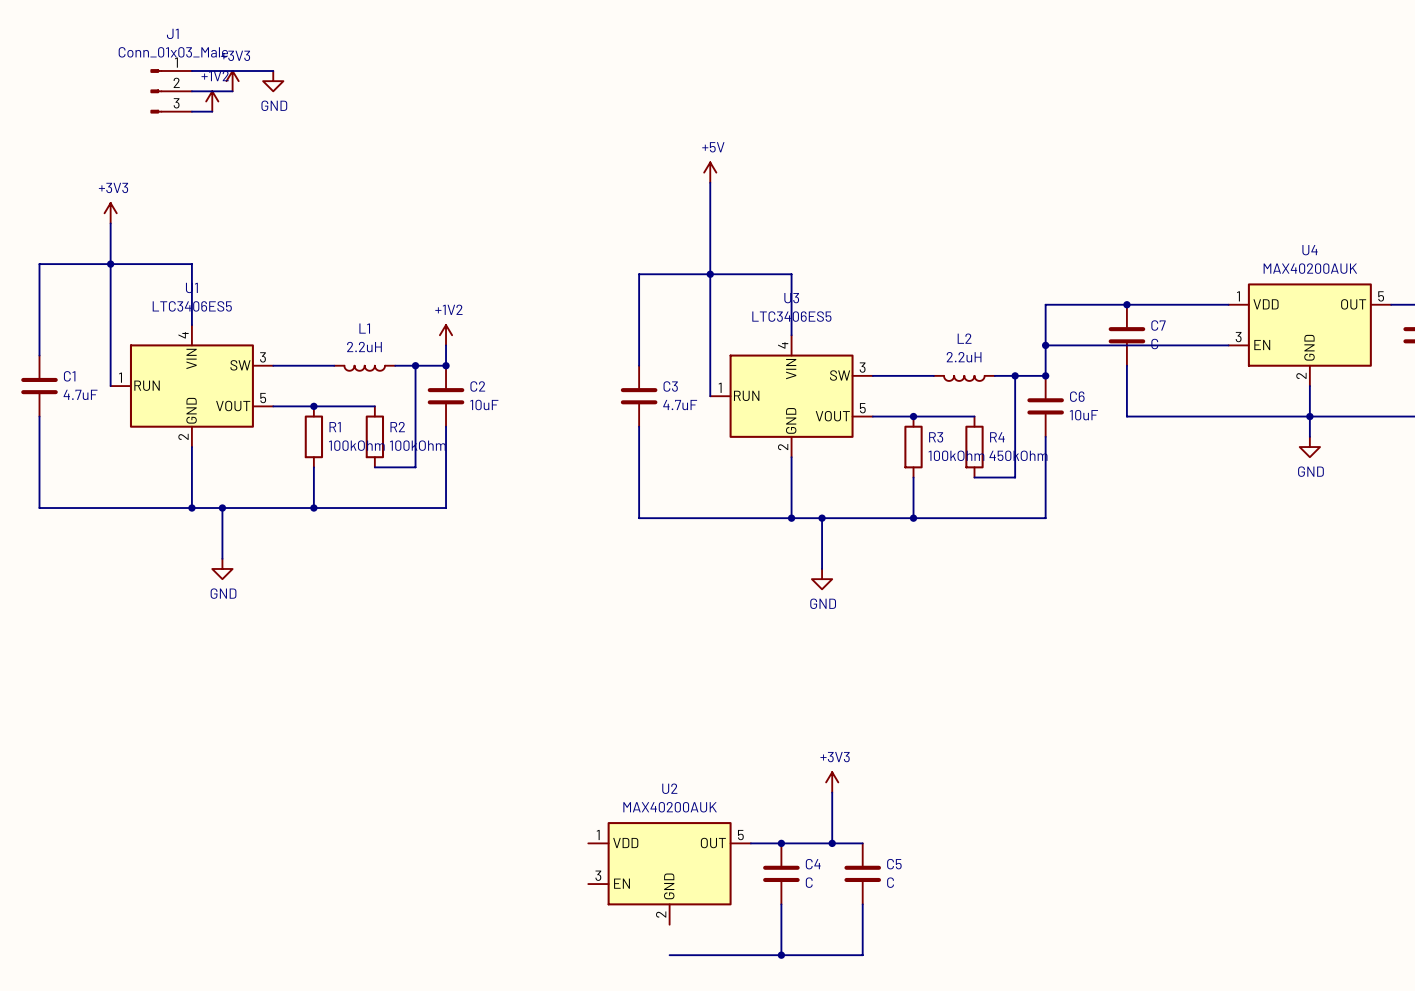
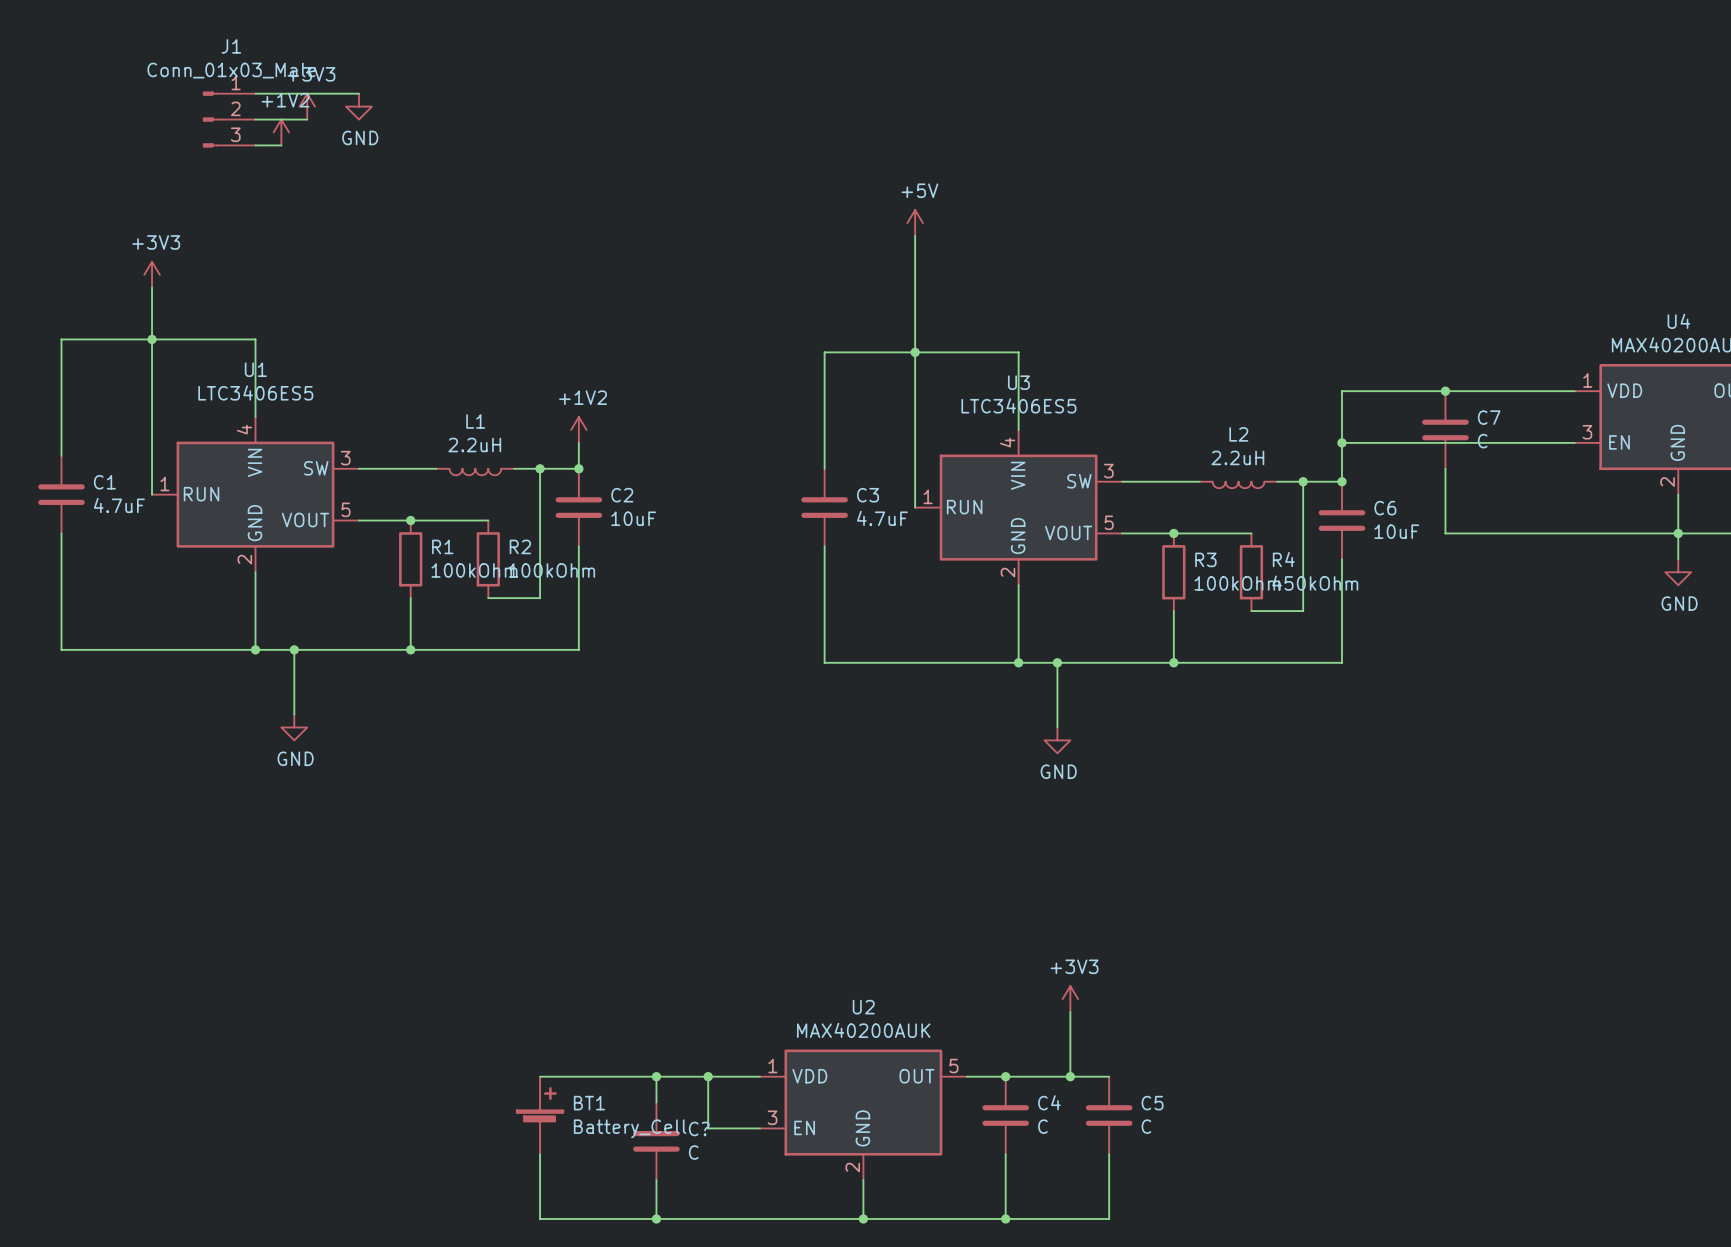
wire: none -> (540, 1076) (759, 1076)
wire: none -> (656, 1076) (656, 1102)
junction: none -> (656, 1076)
wire: none -> (708, 1076) (708, 1128) (759, 1128)
junction: none -> (708, 1076)
BT1: none -> Battery_Cell (540, 1115)
C?: none -> C (656, 1141)
wire: none -> (540, 1154) (540, 1218) (863, 1218) (863, 1180)
wire: none -> (656, 1180) (656, 1218)
junction: none -> (656, 1218)
junction: none -> (863, 1218)

